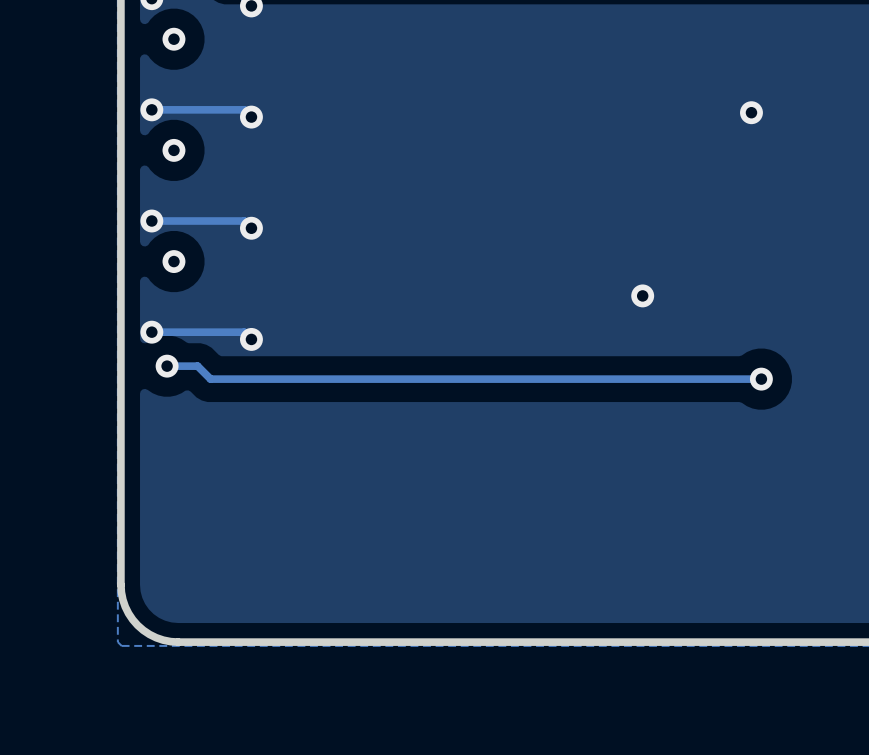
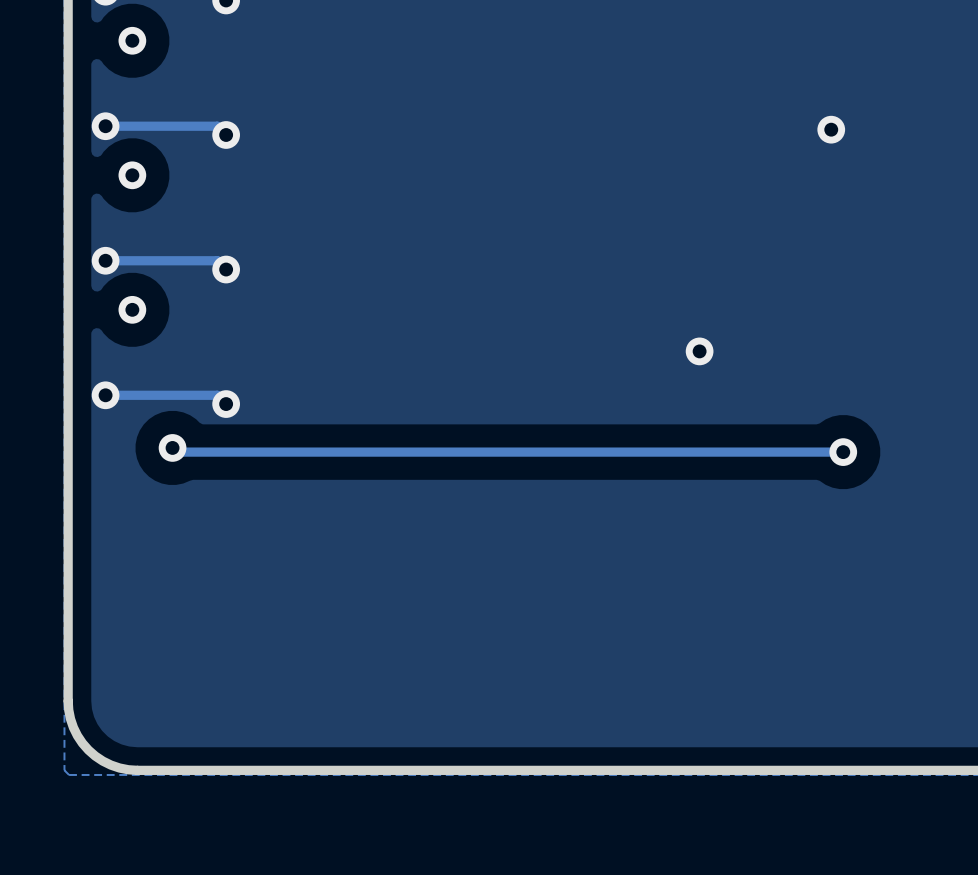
track: (167, 366) (197, 366) (207, 375) -> none
via position: (167, 366) -> (172, 447)

